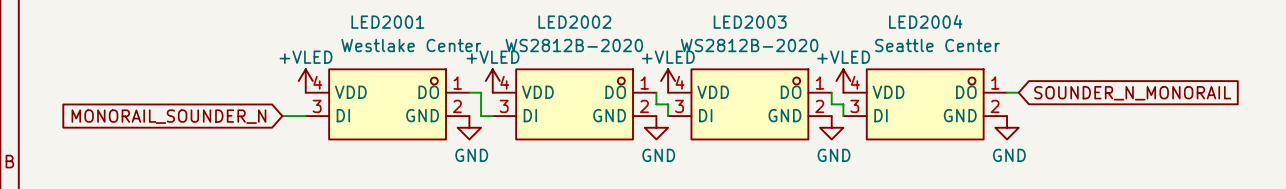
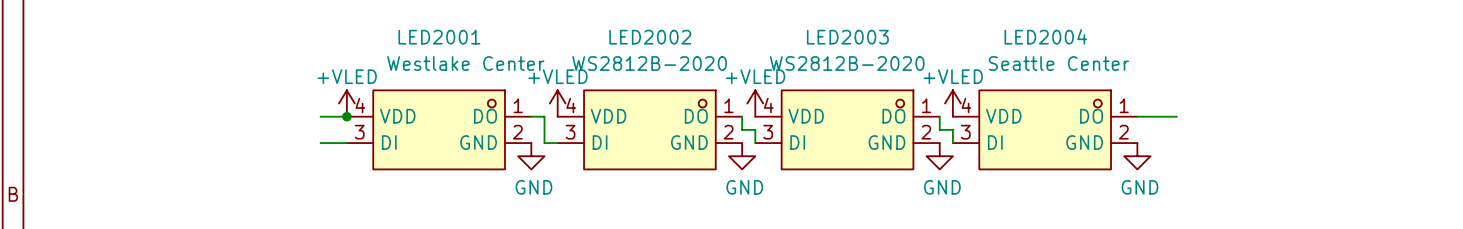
wire: none -> (320, 116) (346, 116)
junction: none -> (346, 116)
wire: none -> (1150, 116) (1176, 116)
global label: SOUNDER_N_MONORAIL (1132, 93) -> none
global label: MONORAIL_SOUNDER_N (168, 116) -> none

